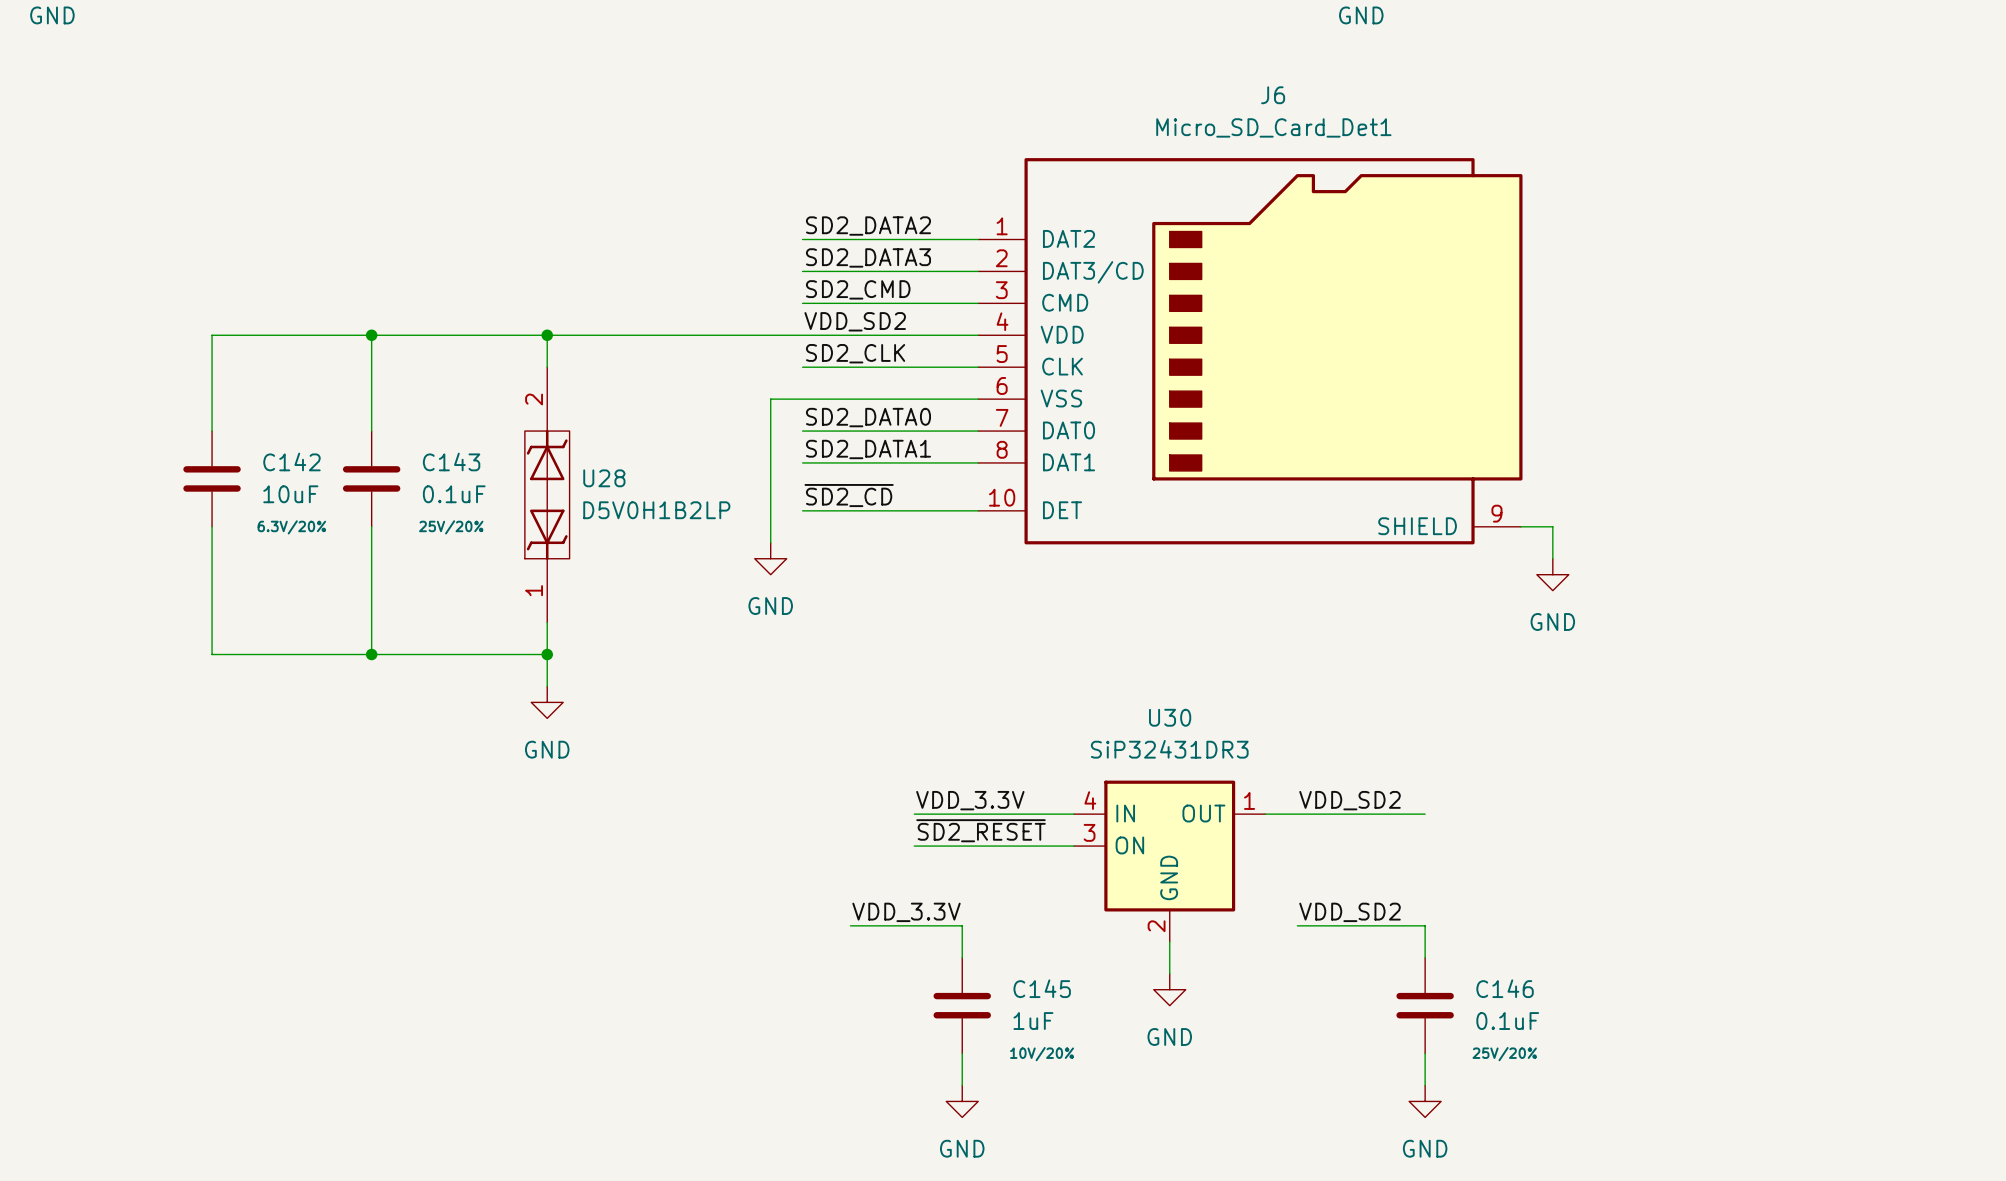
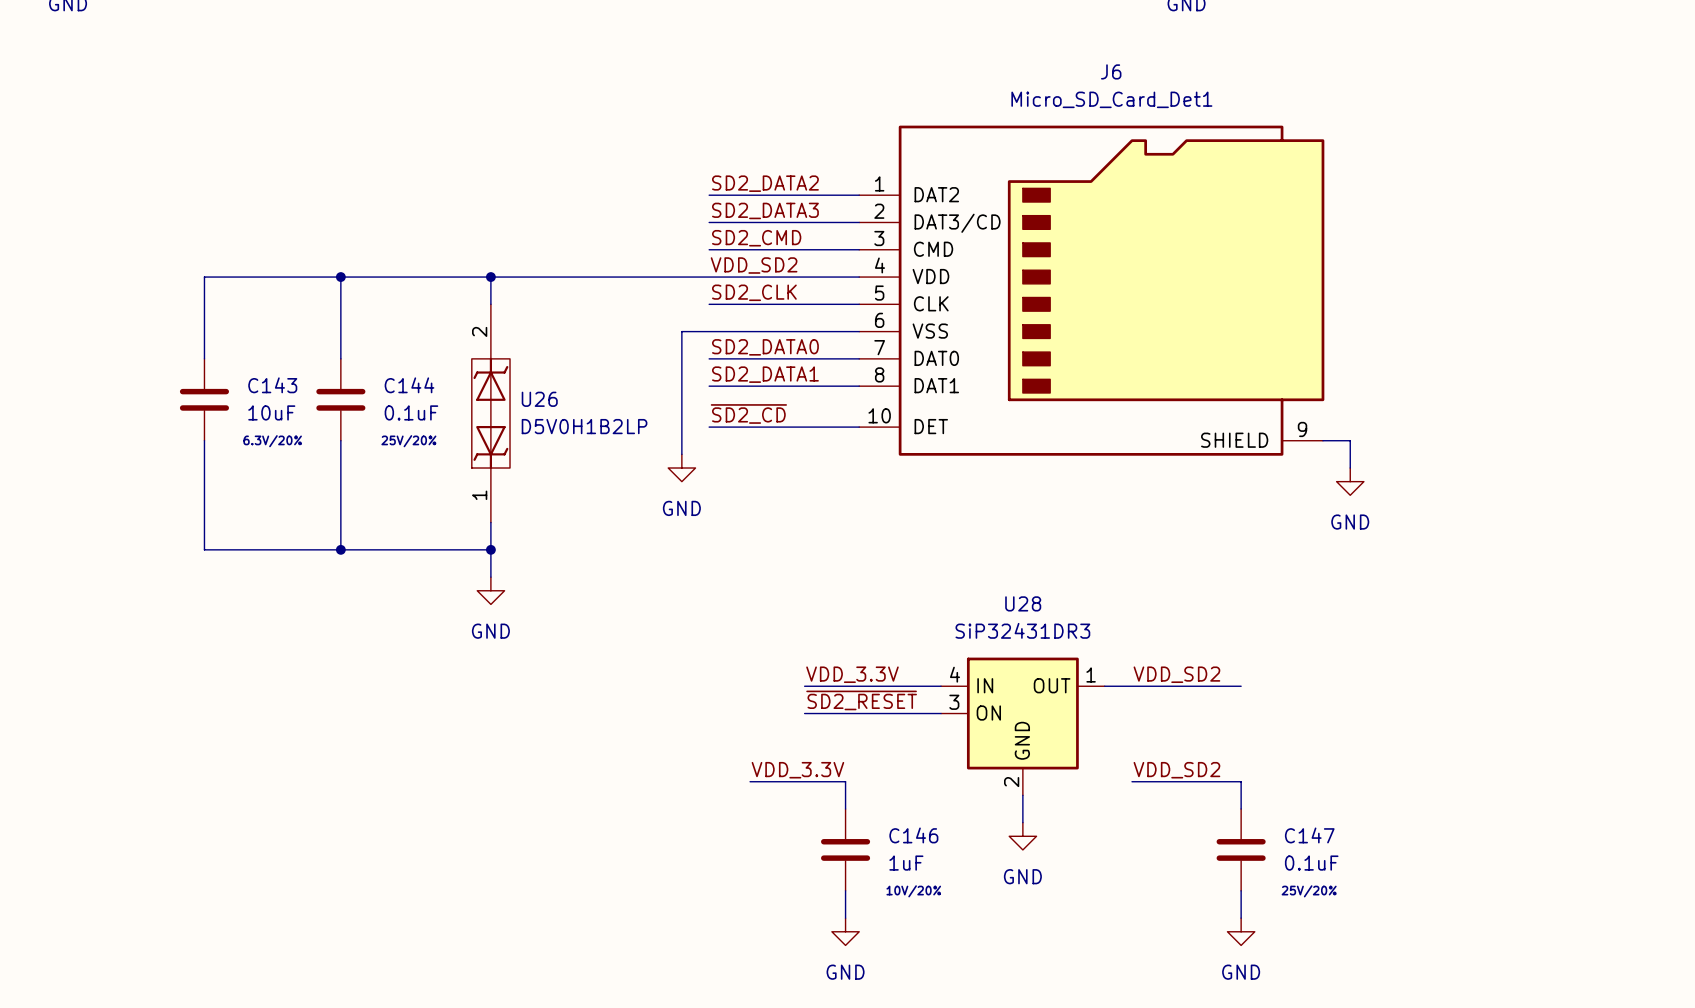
C142 name: C142 (291, 461) -> C143 (272, 385)
C143 name: C143 (451, 461) -> C144 (409, 385)
U28 name: U28 (604, 478) -> U26 (539, 399)
U30 name: U30 (1170, 717) -> U28 (1023, 603)
C145 name: C145 (1042, 988) -> C146 (913, 835)
C146 name: C146 (1505, 988) -> C147 (1309, 835)

